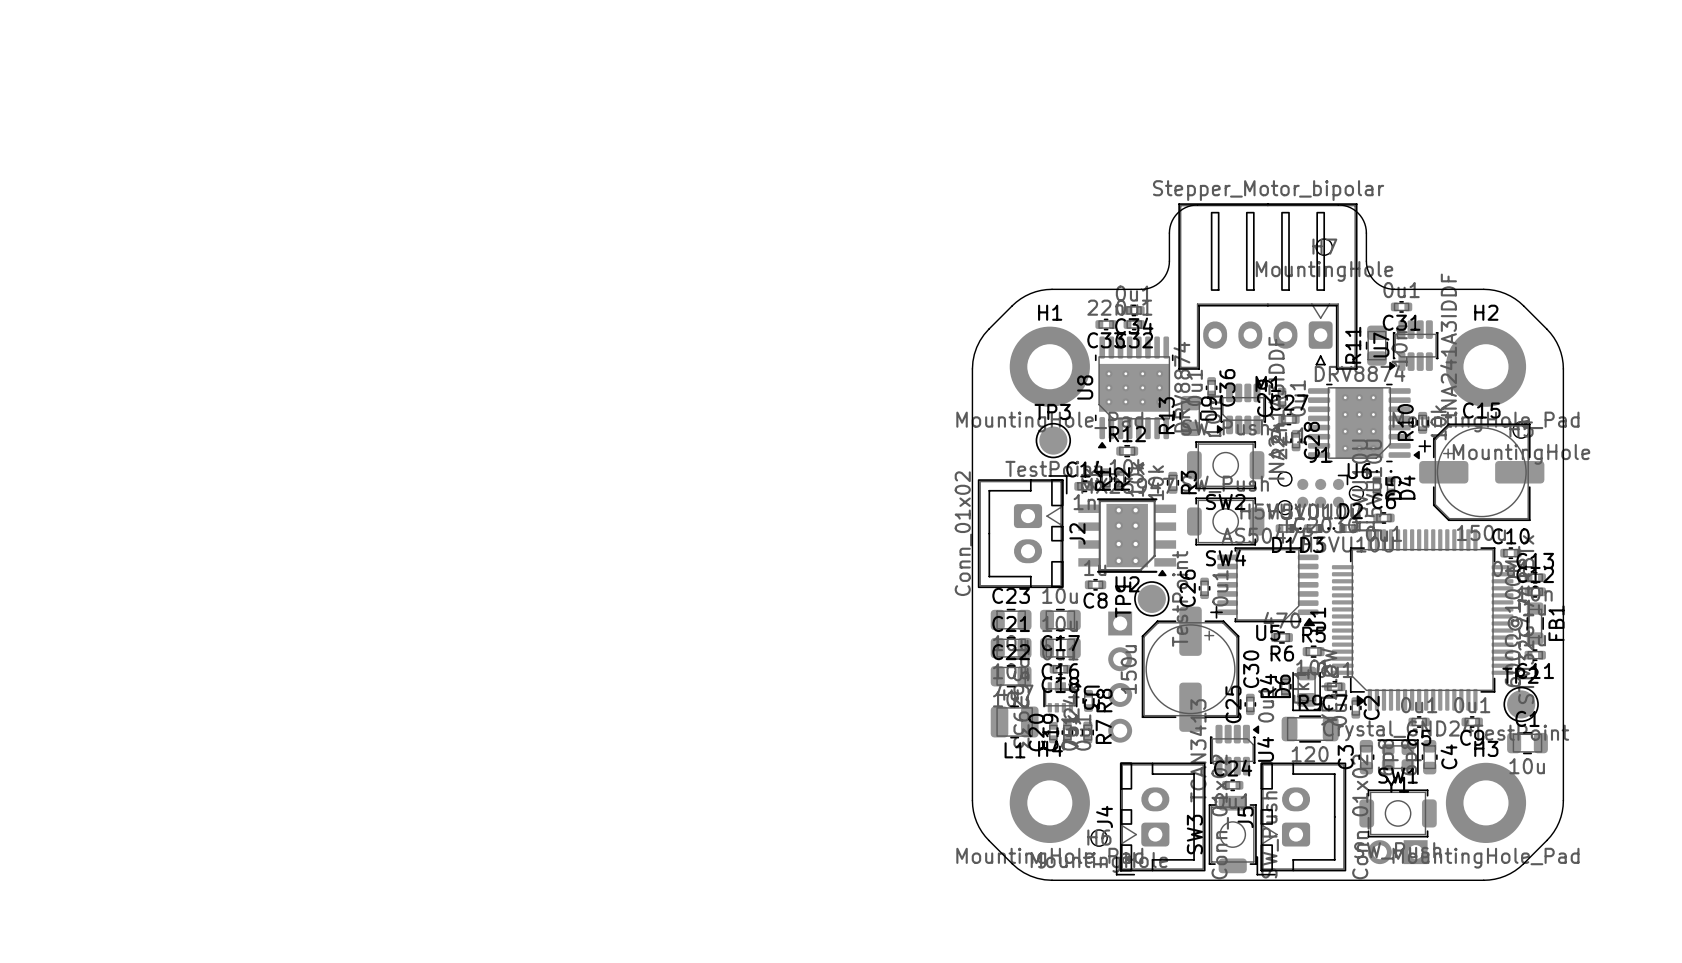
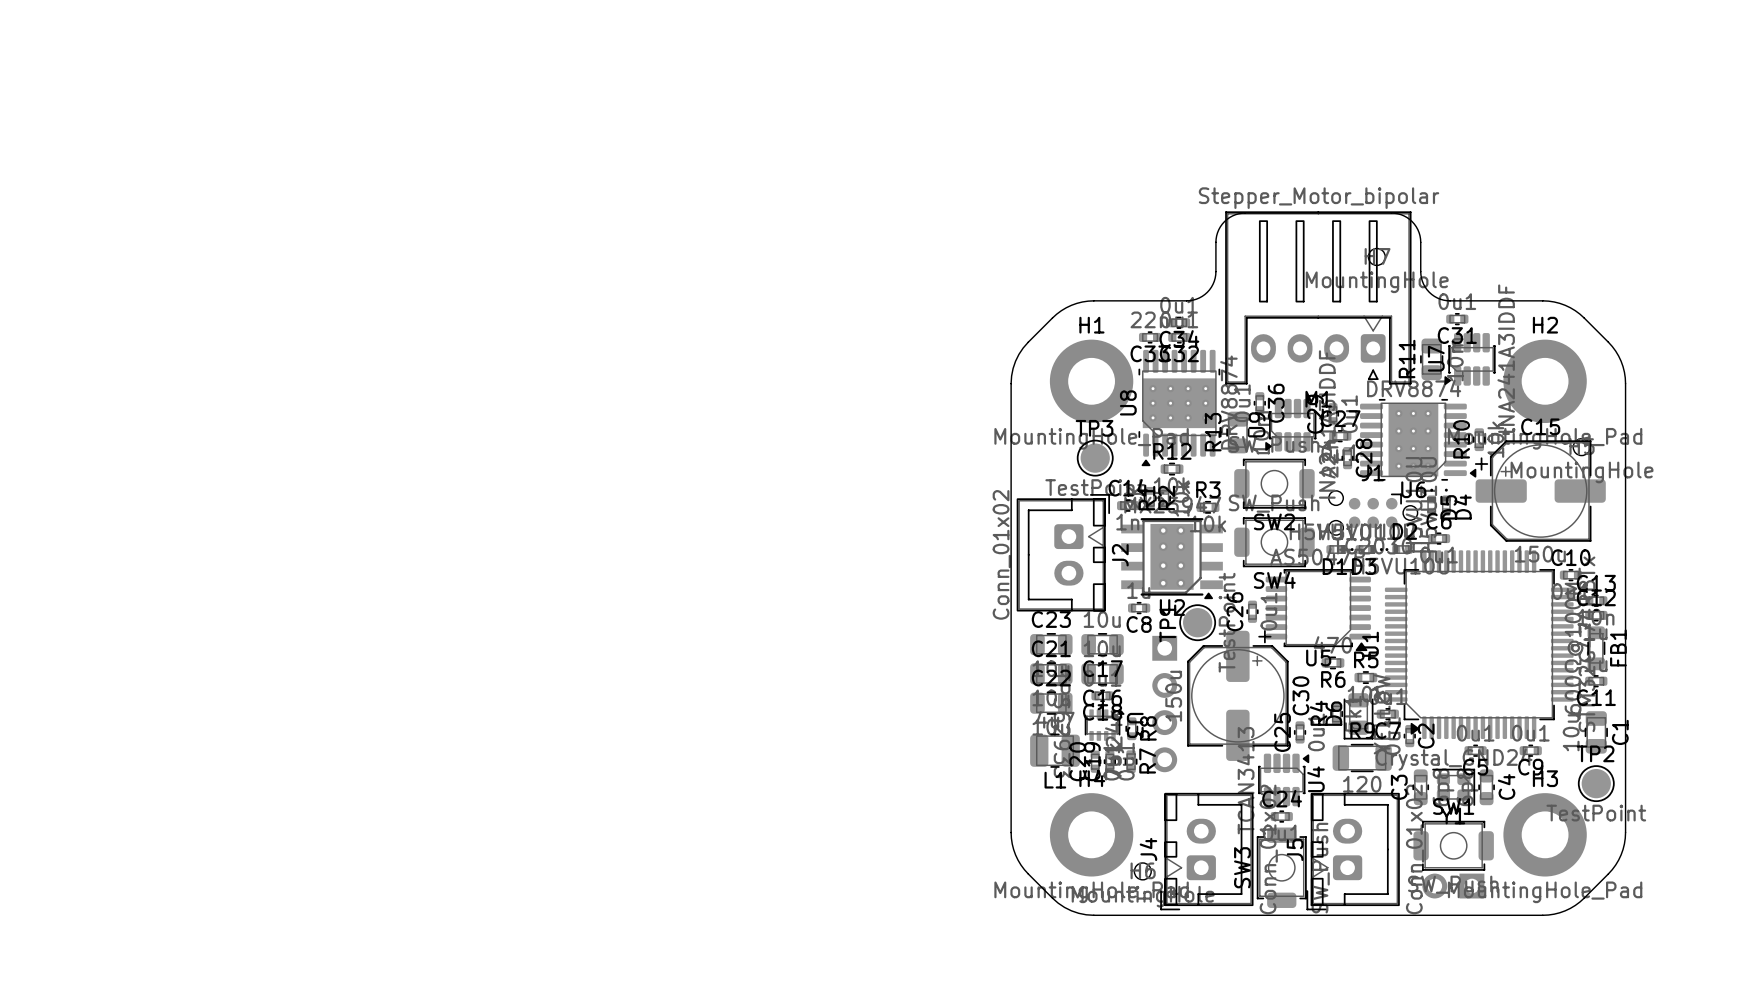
R3 rotation: 0° (1172, 482) -> 90° clockwise (1208, 507)
TP2 position: (1521, 704) -> (1596, 783)
C1 rotation: 0° (1527, 743) -> 90° clockwise (1596, 732)
C1 position: (1527, 743) -> (1596, 732)

